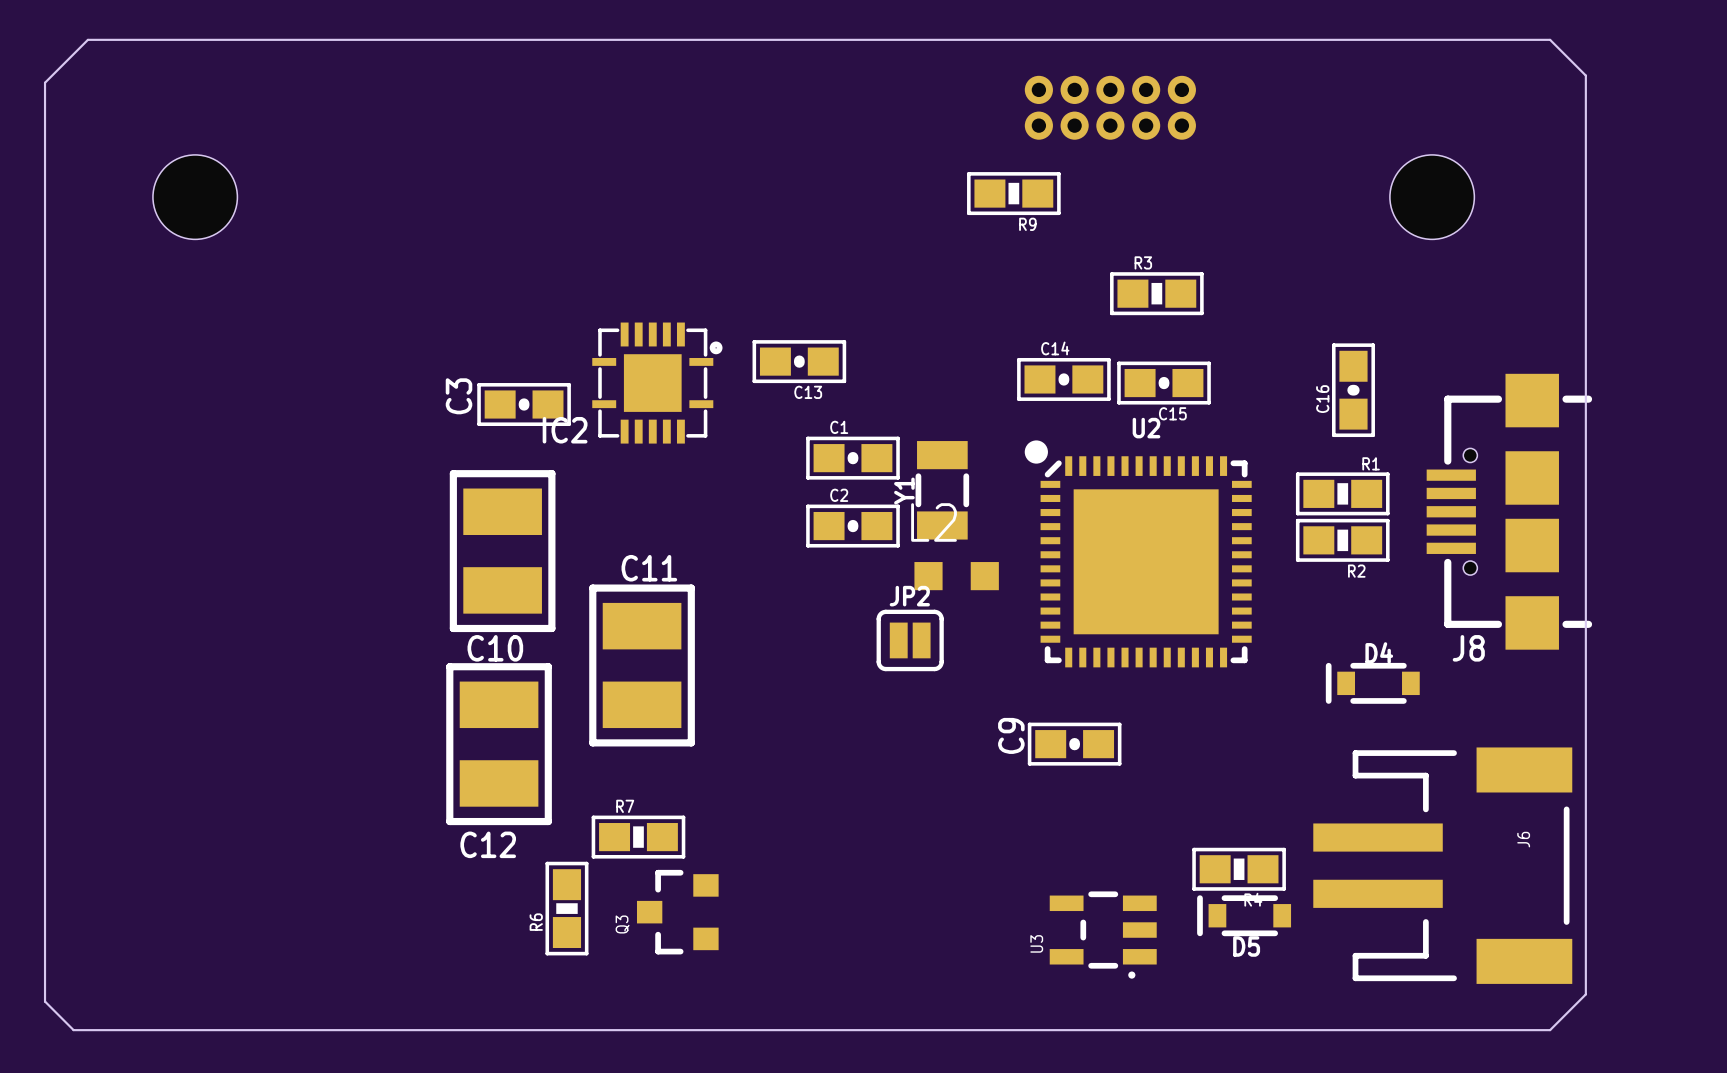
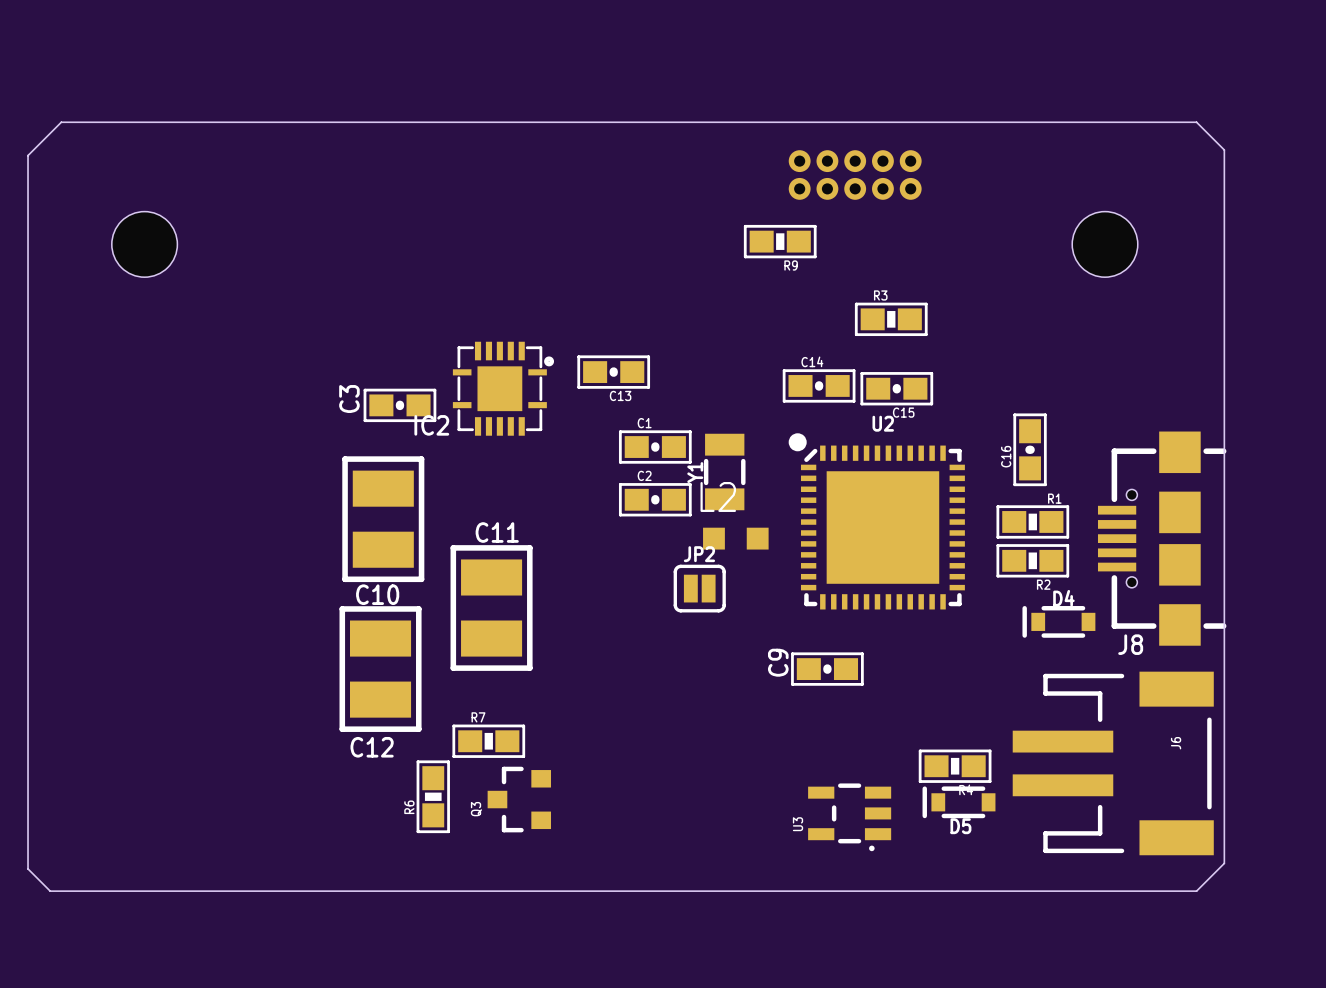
C16 position: (1353, 390) -> (1030, 449)
R1 position: (1342, 493) -> (1032, 521)
J8 position: (1509, 511) -> (1162, 538)
R2 position: (1342, 540) -> (1032, 560)

